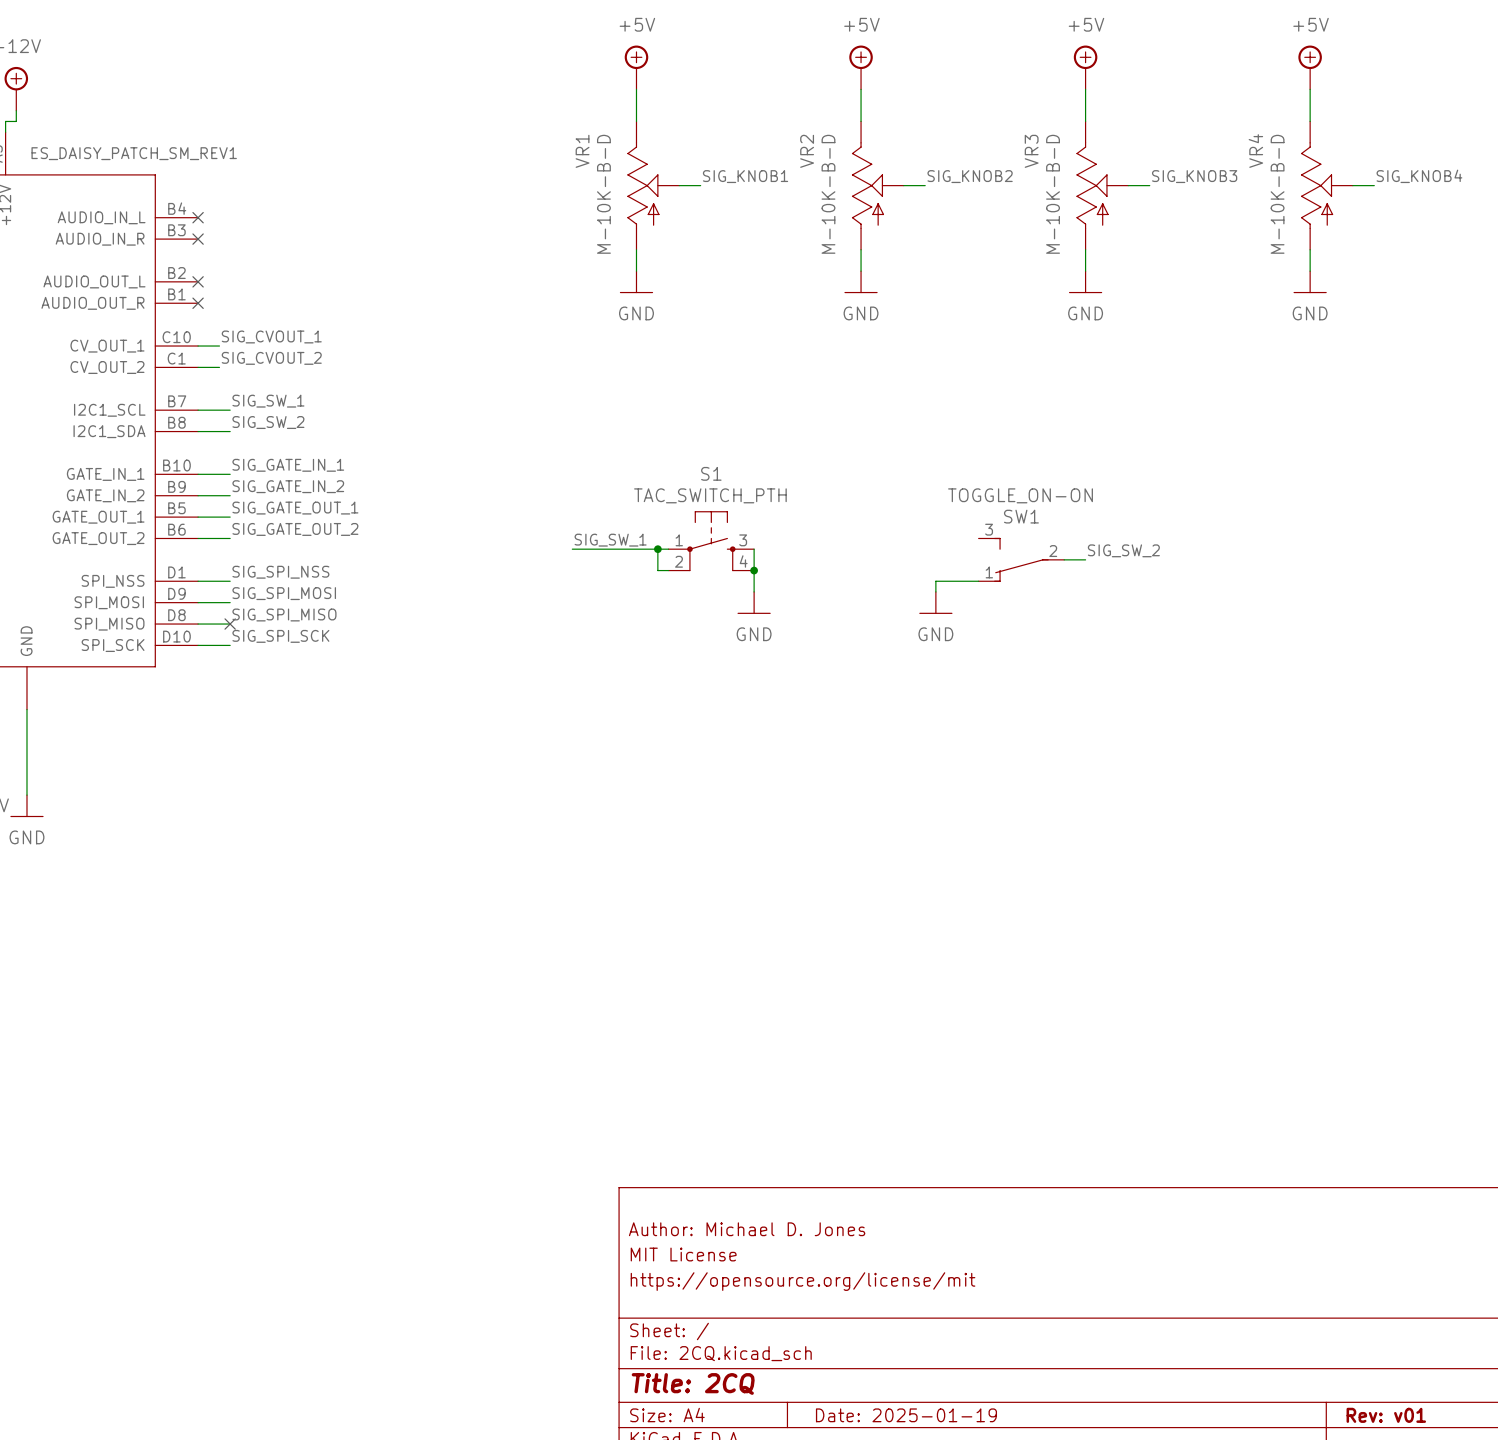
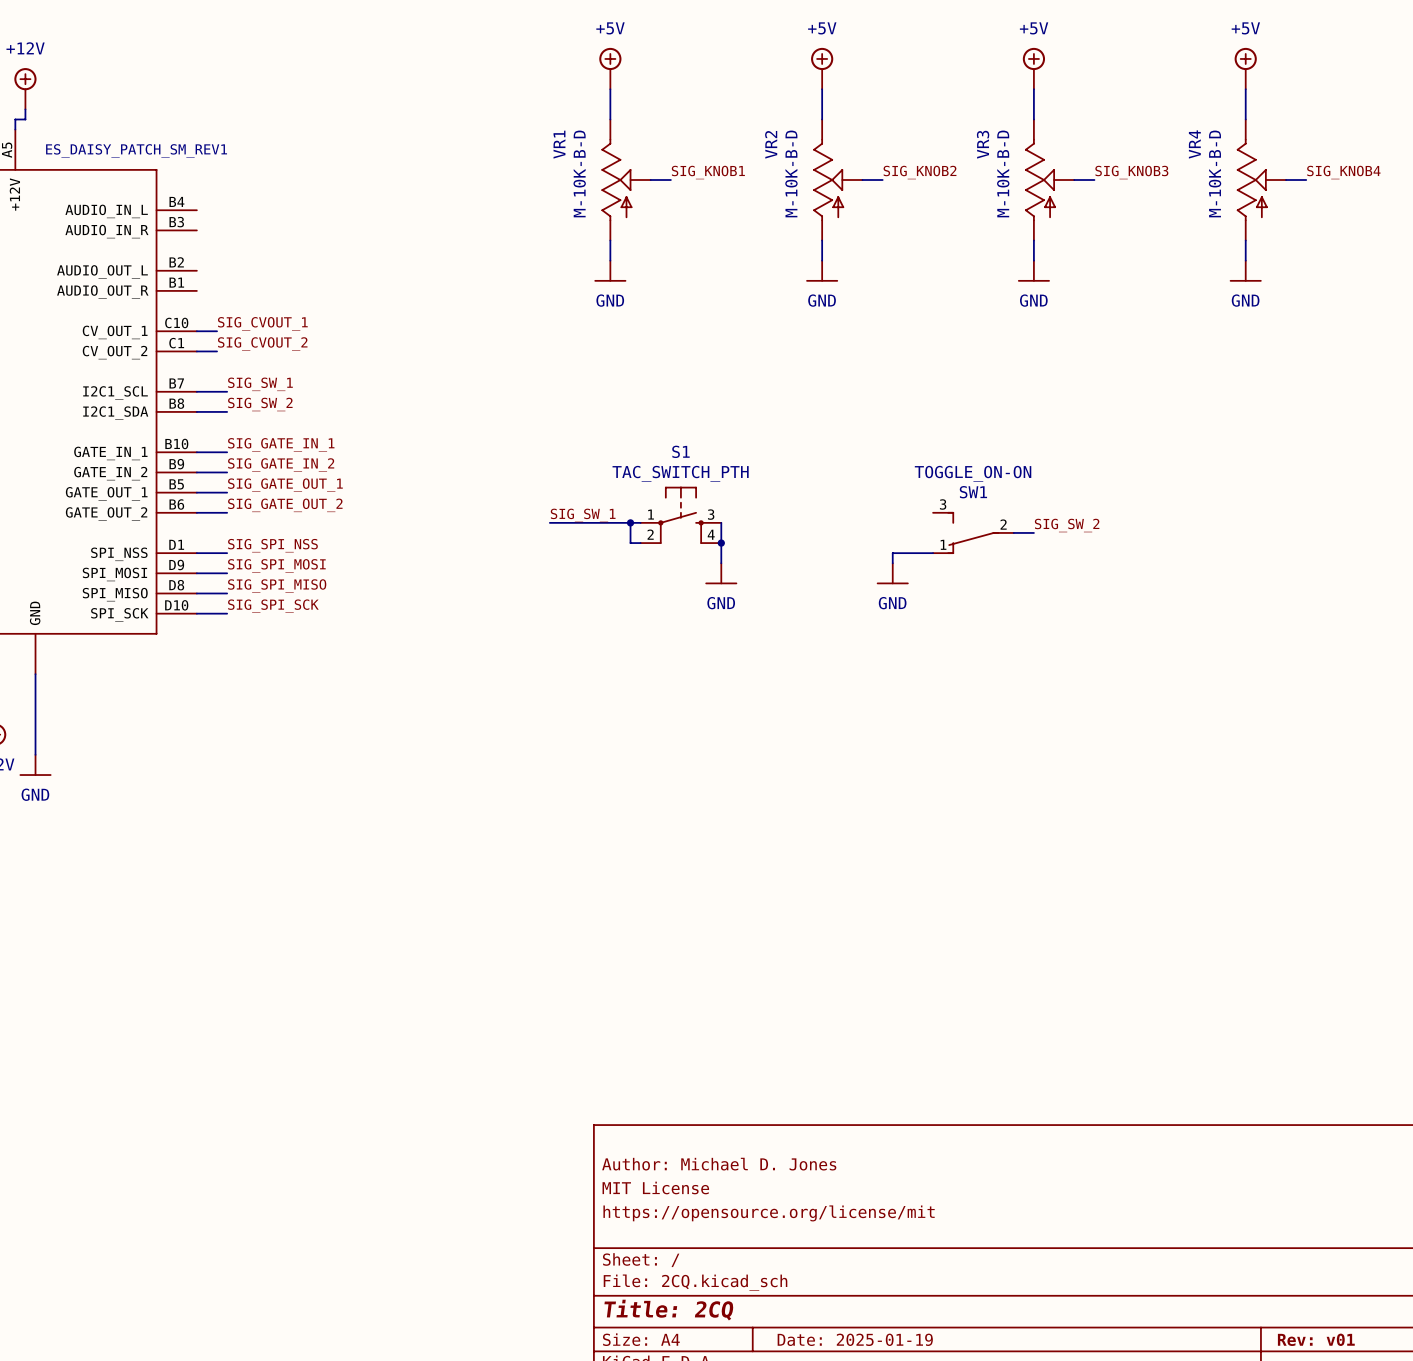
no-connect mark: (198, 217) -> none
no-connect mark: (198, 239) -> none
no-connect mark: (198, 281) -> none
no-connect mark: (198, 303) -> none
no-connect mark: (230, 624) -> none

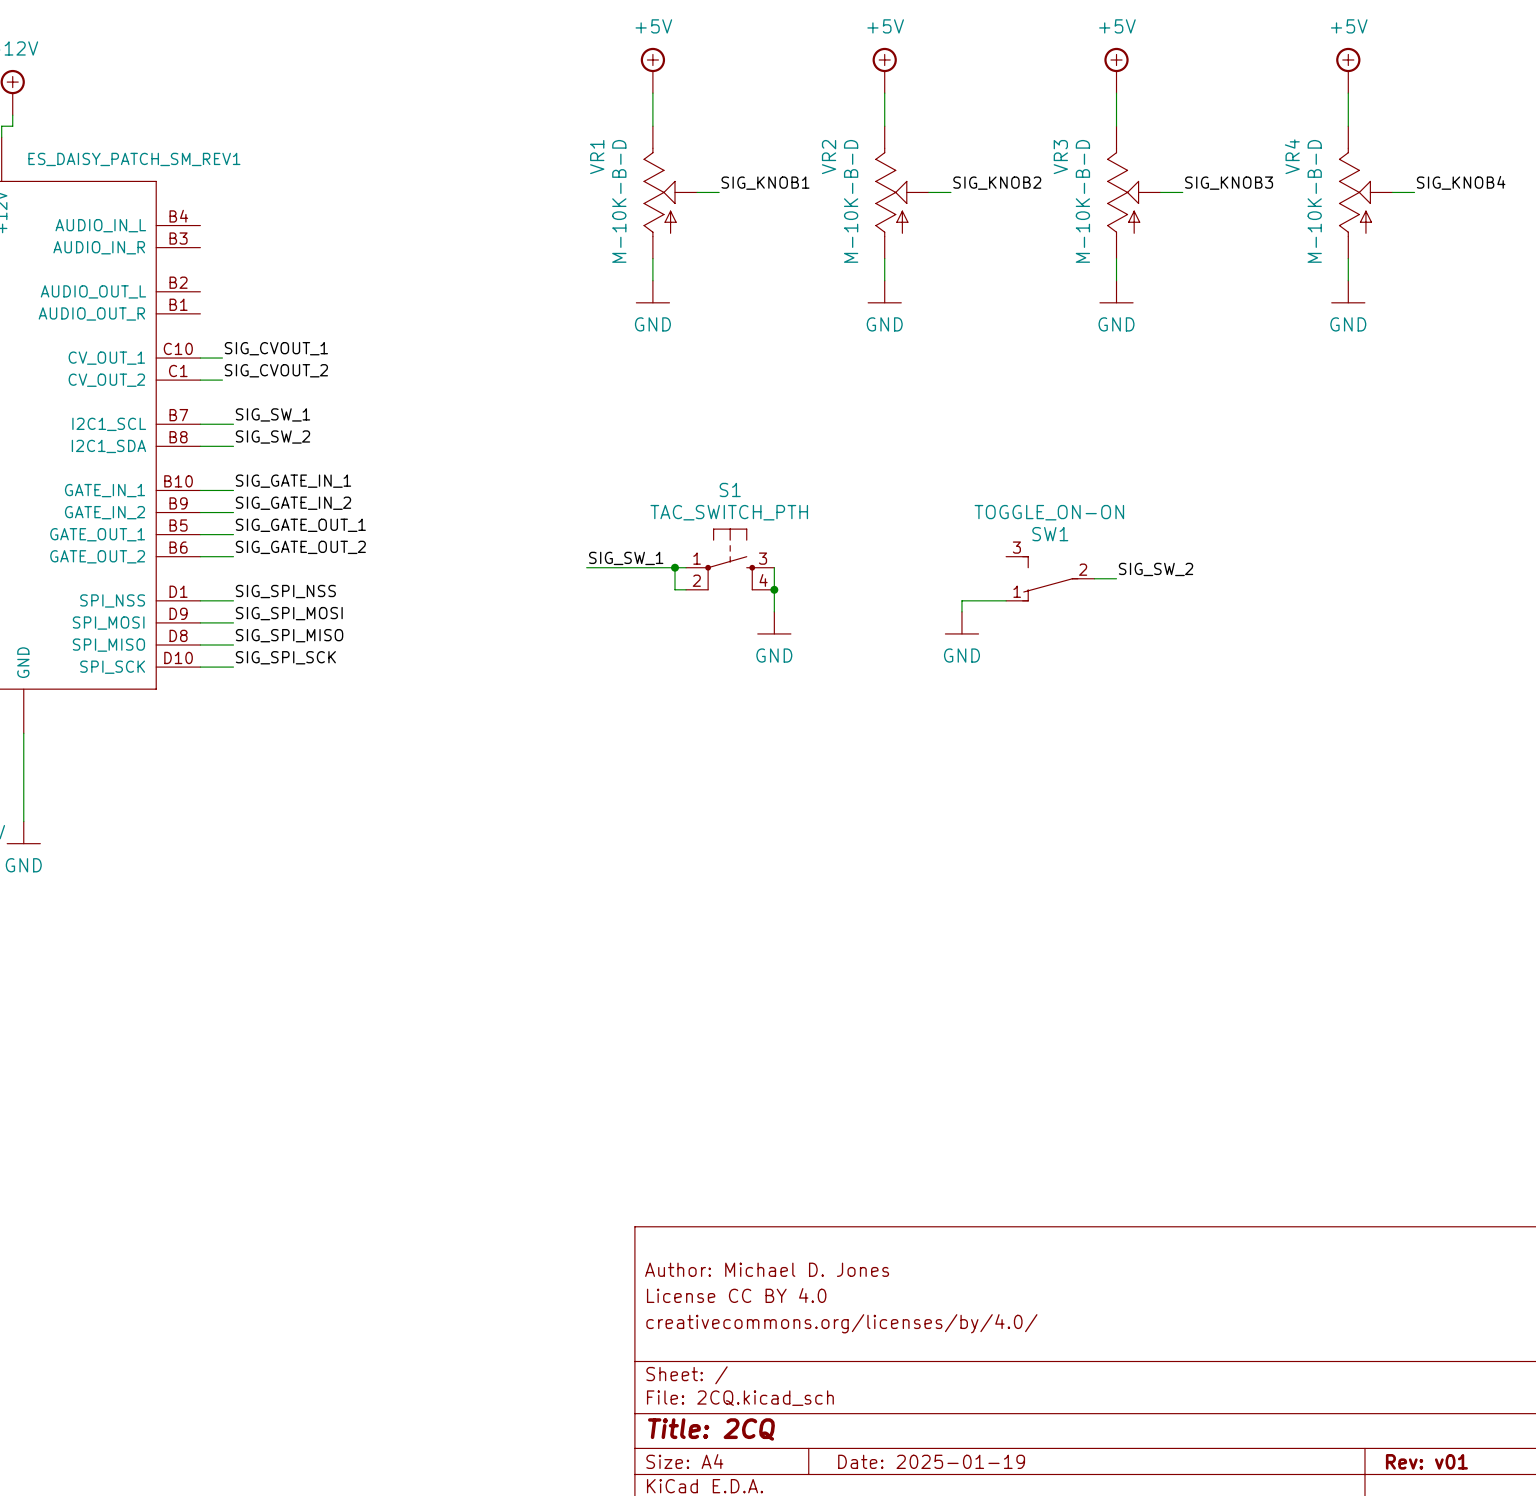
title block: MIT License (655, 1188) -> License CC BY 4.0 (736, 1295)
title block: https://opensource.org/license/mit (769, 1213) -> creativecommons.org/licenses/by/4.0/ (841, 1323)

